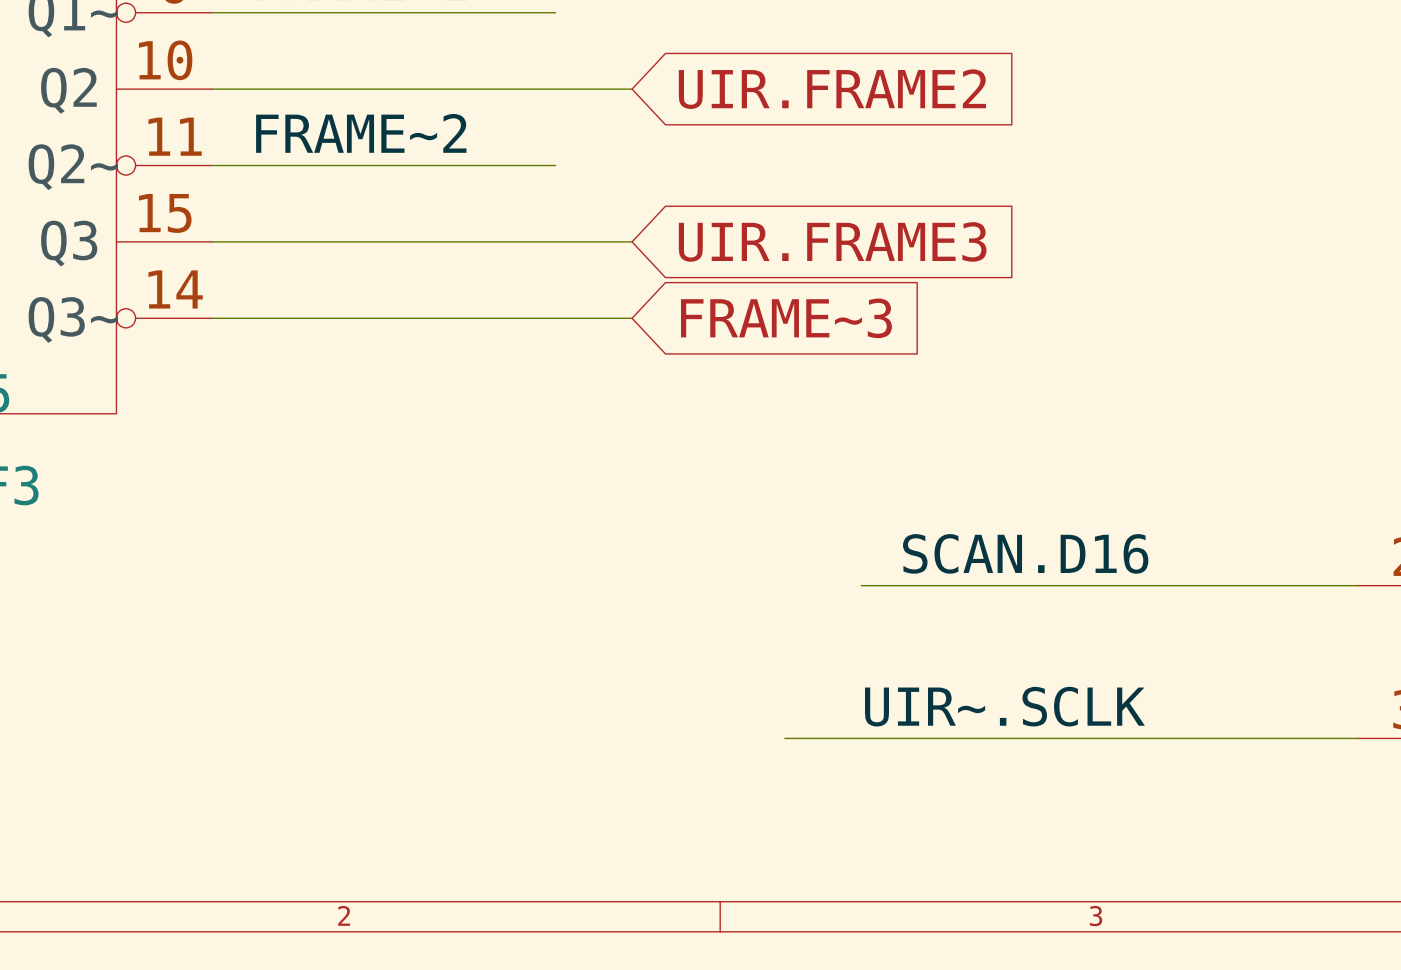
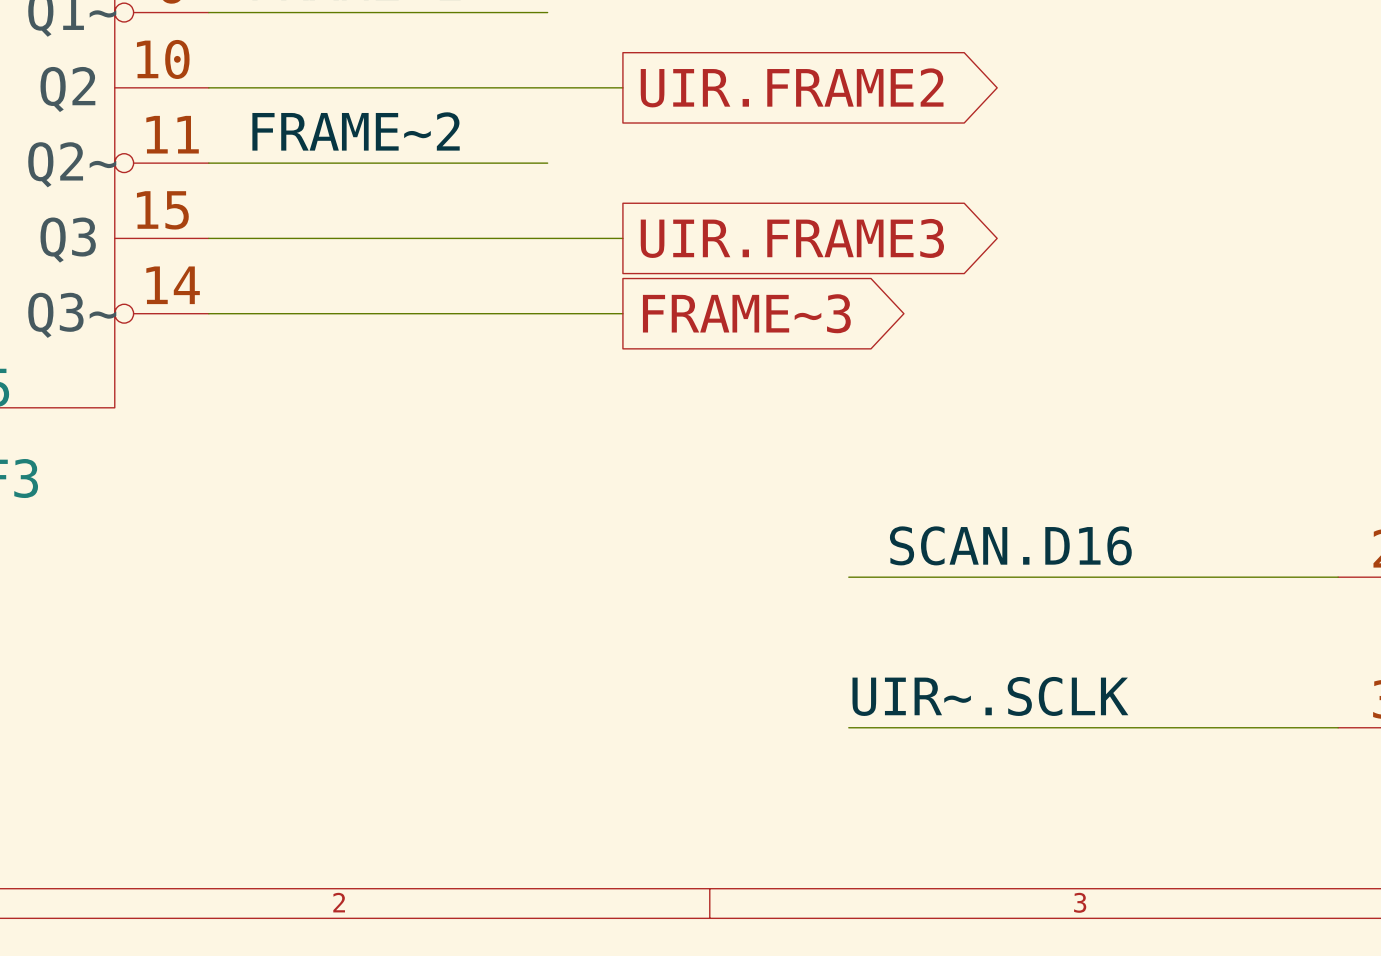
global label shape: input (832, 89) -> output (792, 87)
global label shape: input (832, 241) -> output (792, 238)
global label shape: input (786, 318) -> output (746, 313)
wire: (784, 738) (861, 738) -> none

